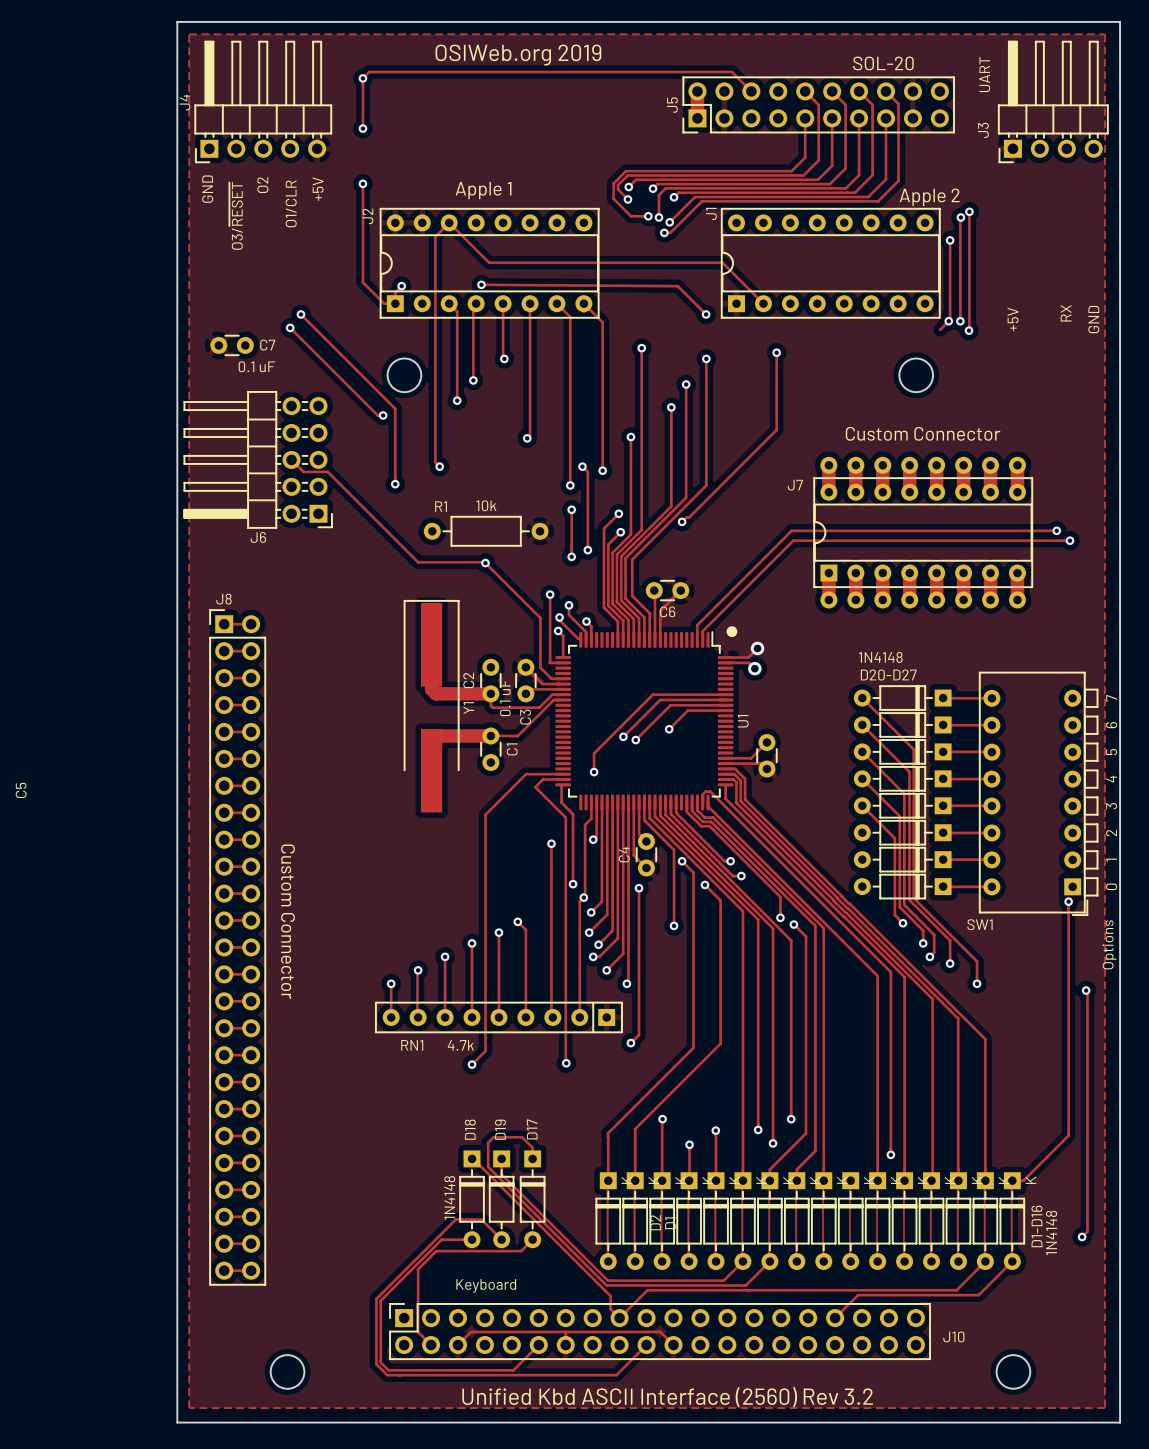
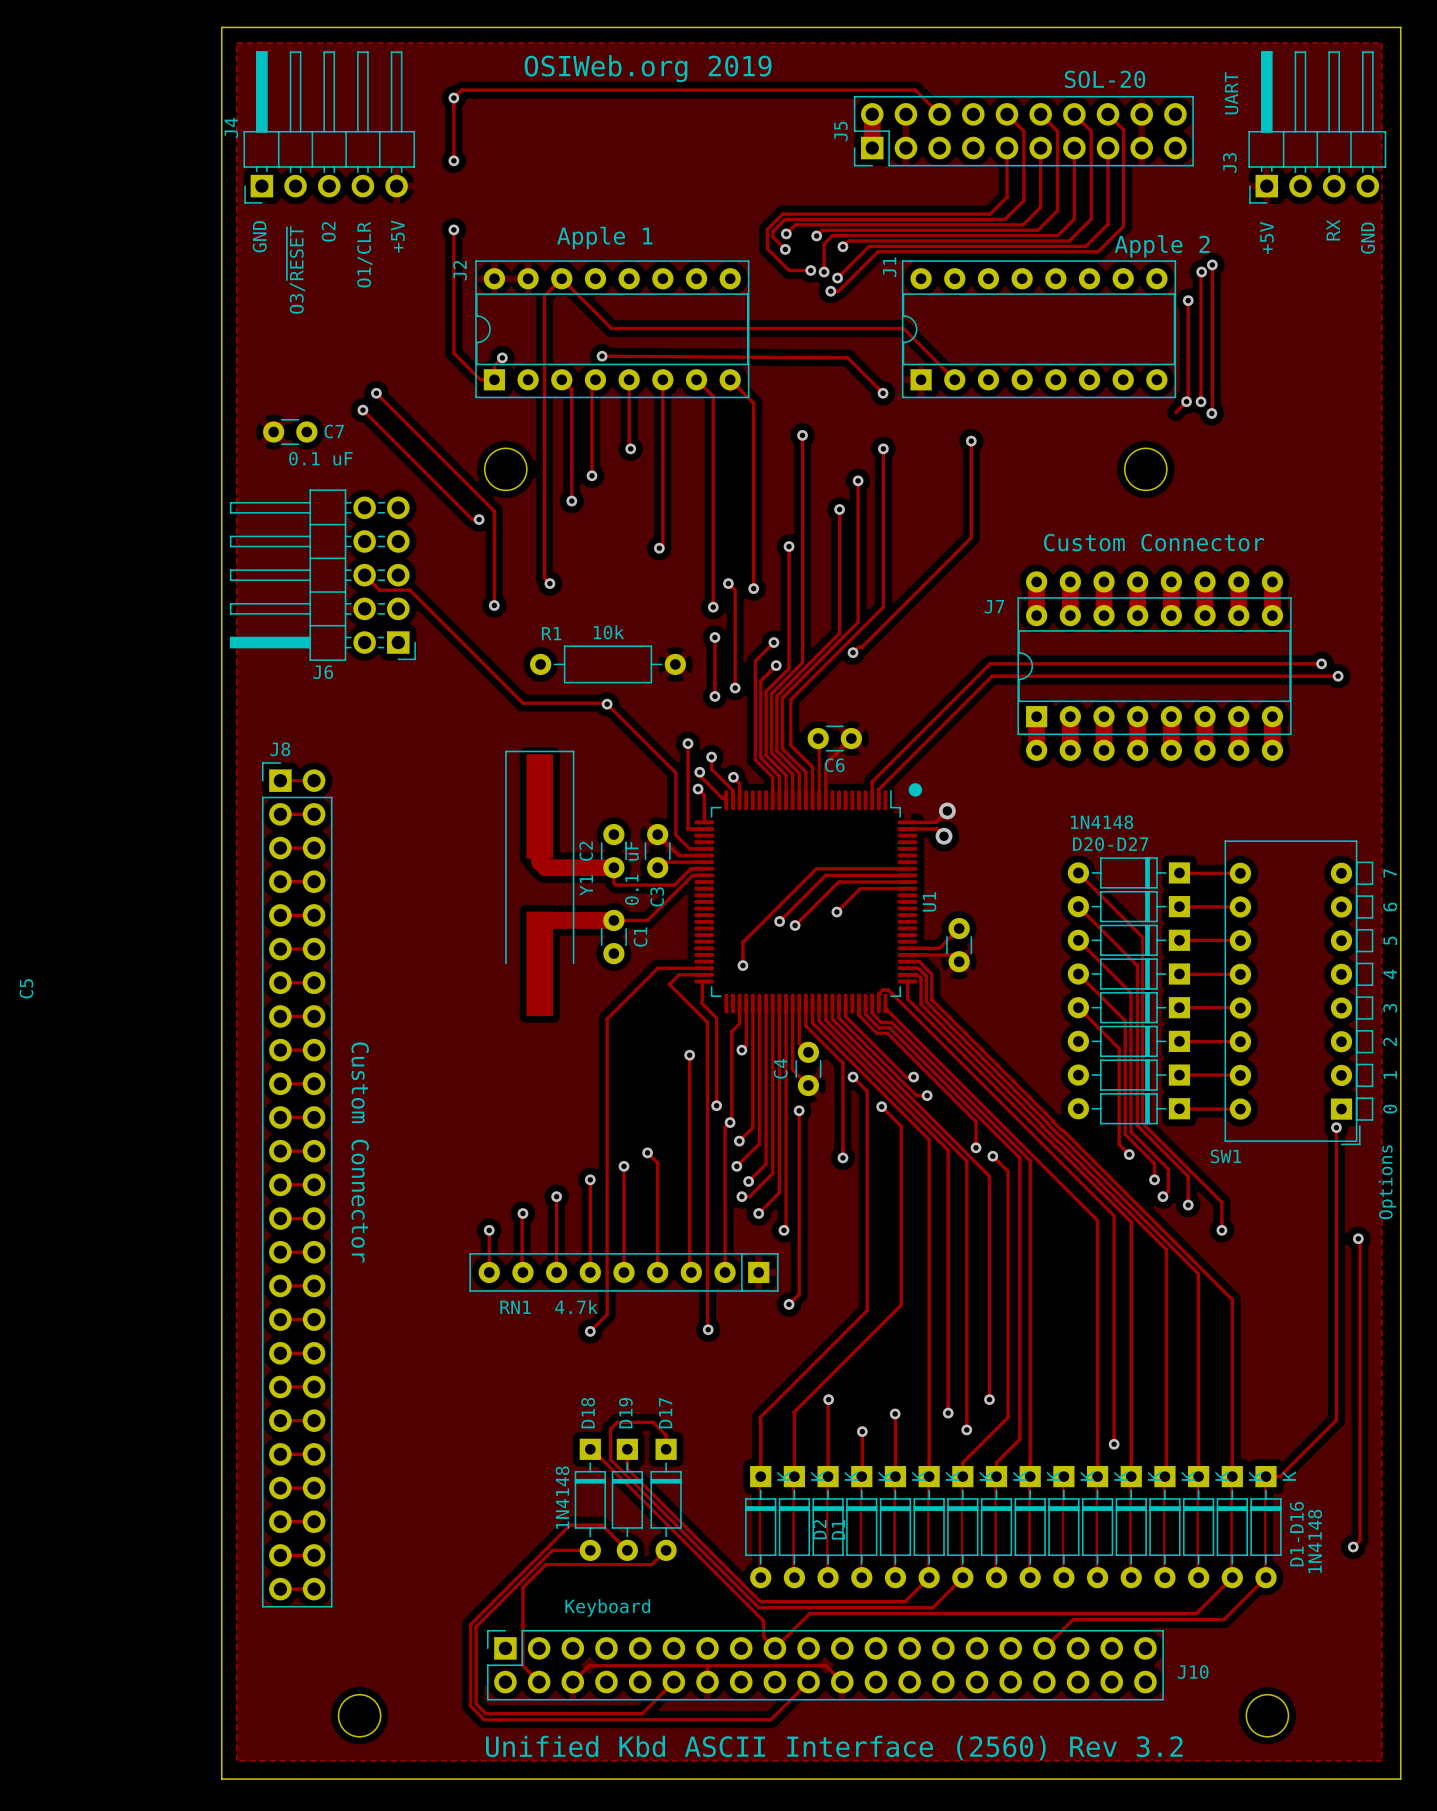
text position: RX (1066, 313) -> RX (1333, 230)
text position: +5V (1013, 319) -> +5V (1267, 237)
text position: GND (1093, 319) -> GND (1367, 238)

